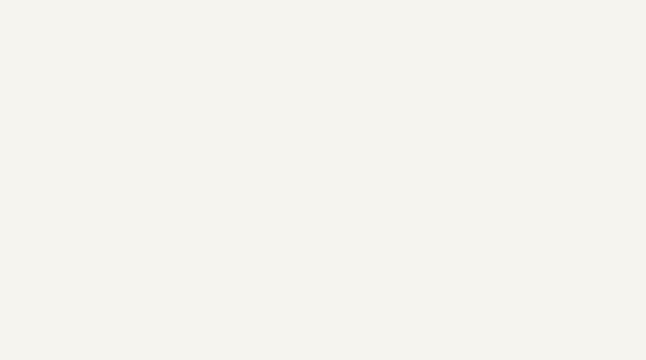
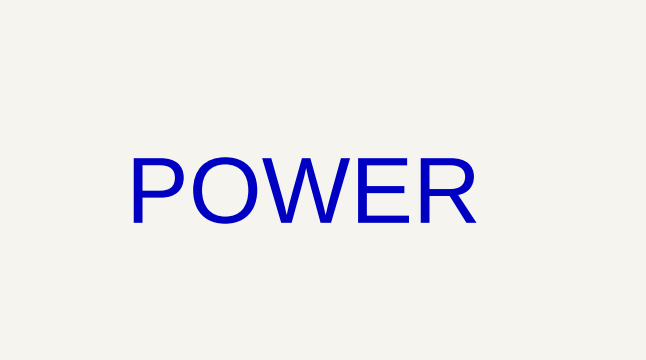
text: none -> POWER (305, 190)

